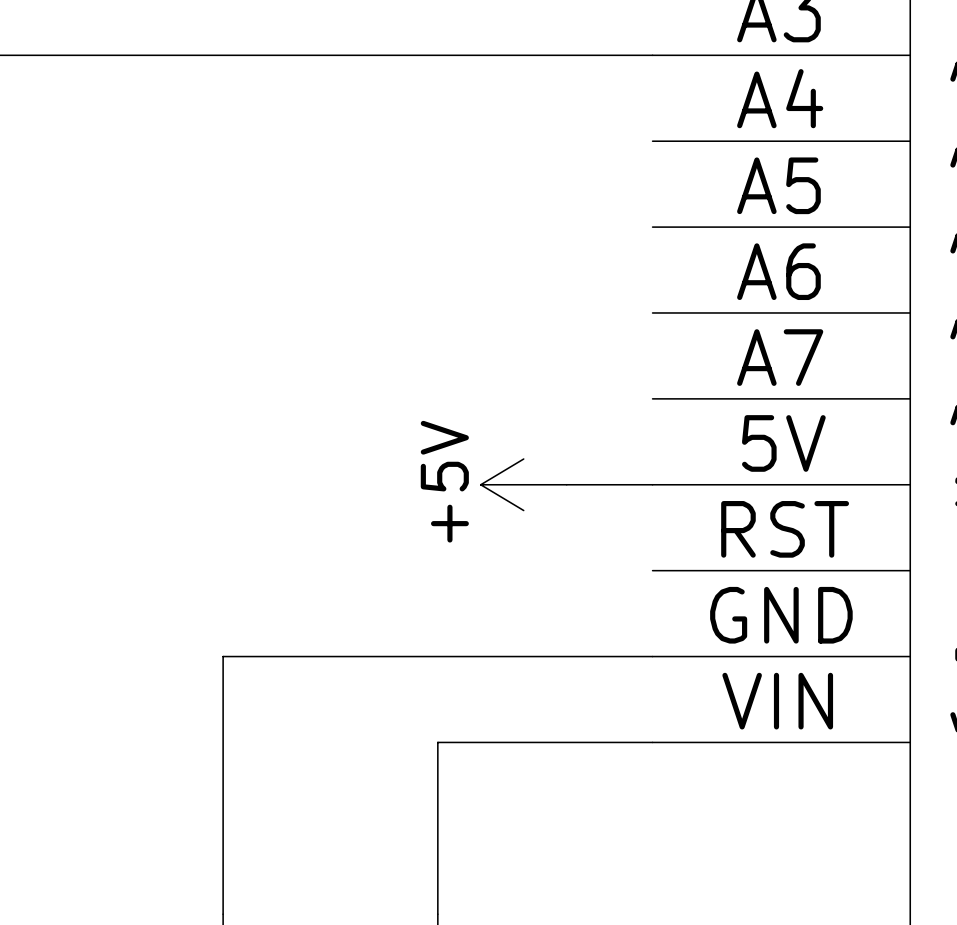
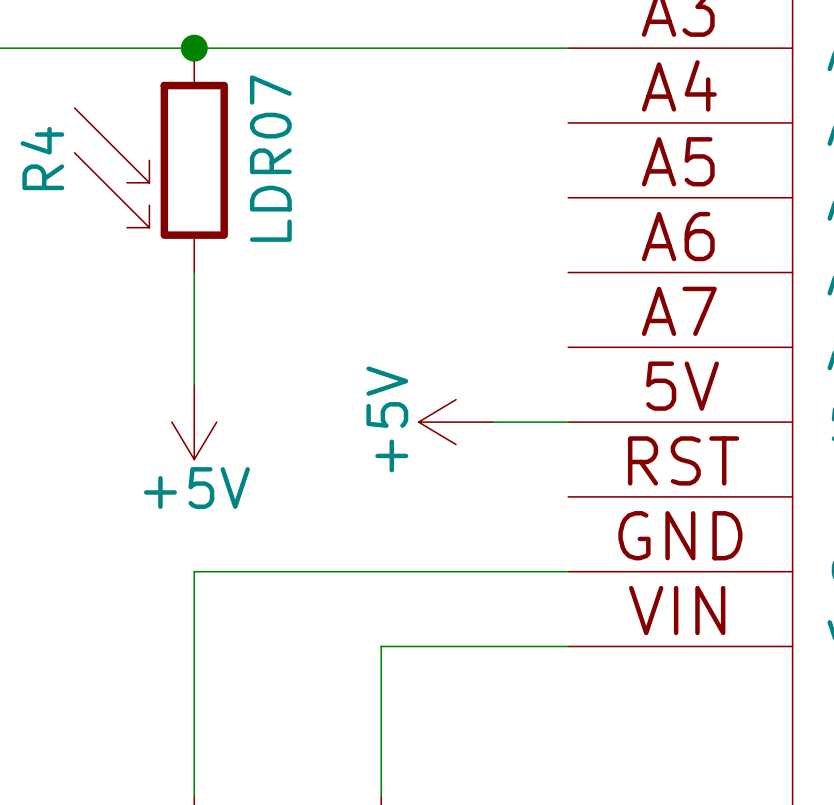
junction: none -> (194, 48)
R4: none -> LDR07 (151, 160)
wire: none -> (194, 272) (194, 384)
power symbol: none -> +5V (194, 422)

